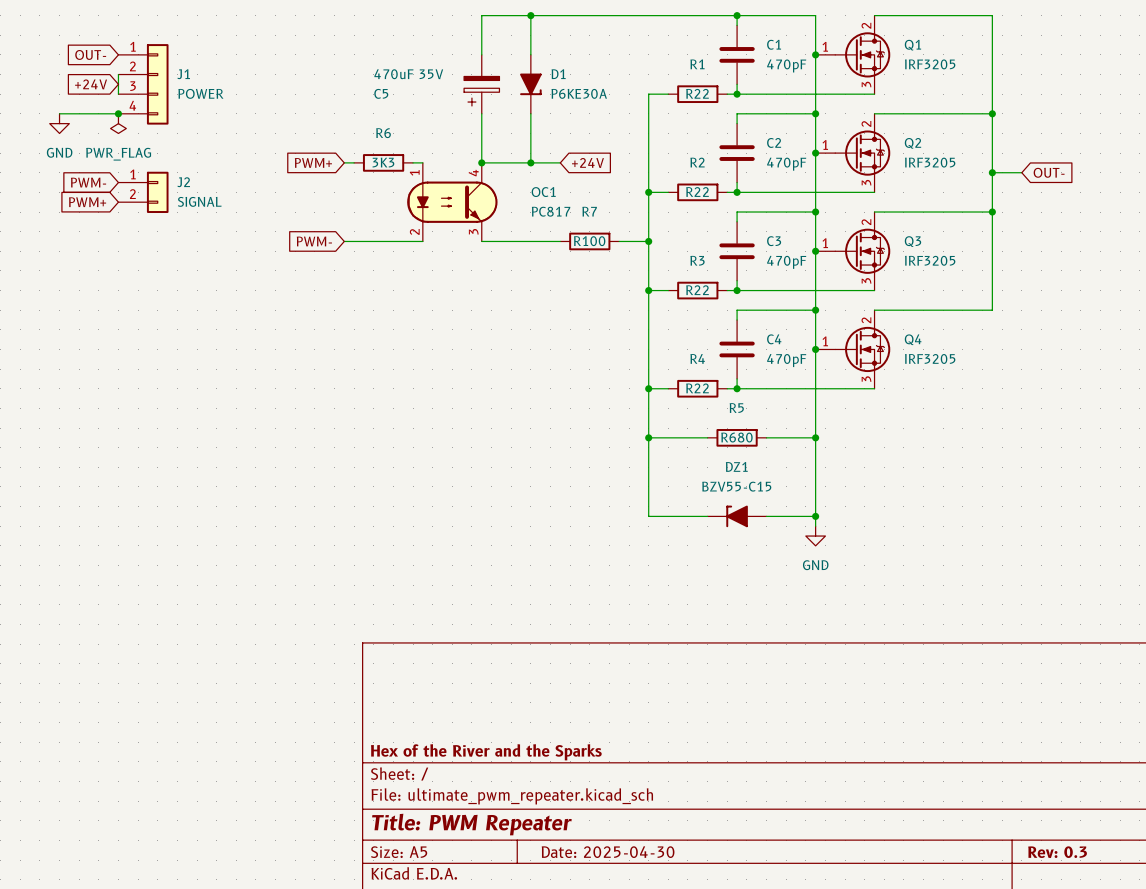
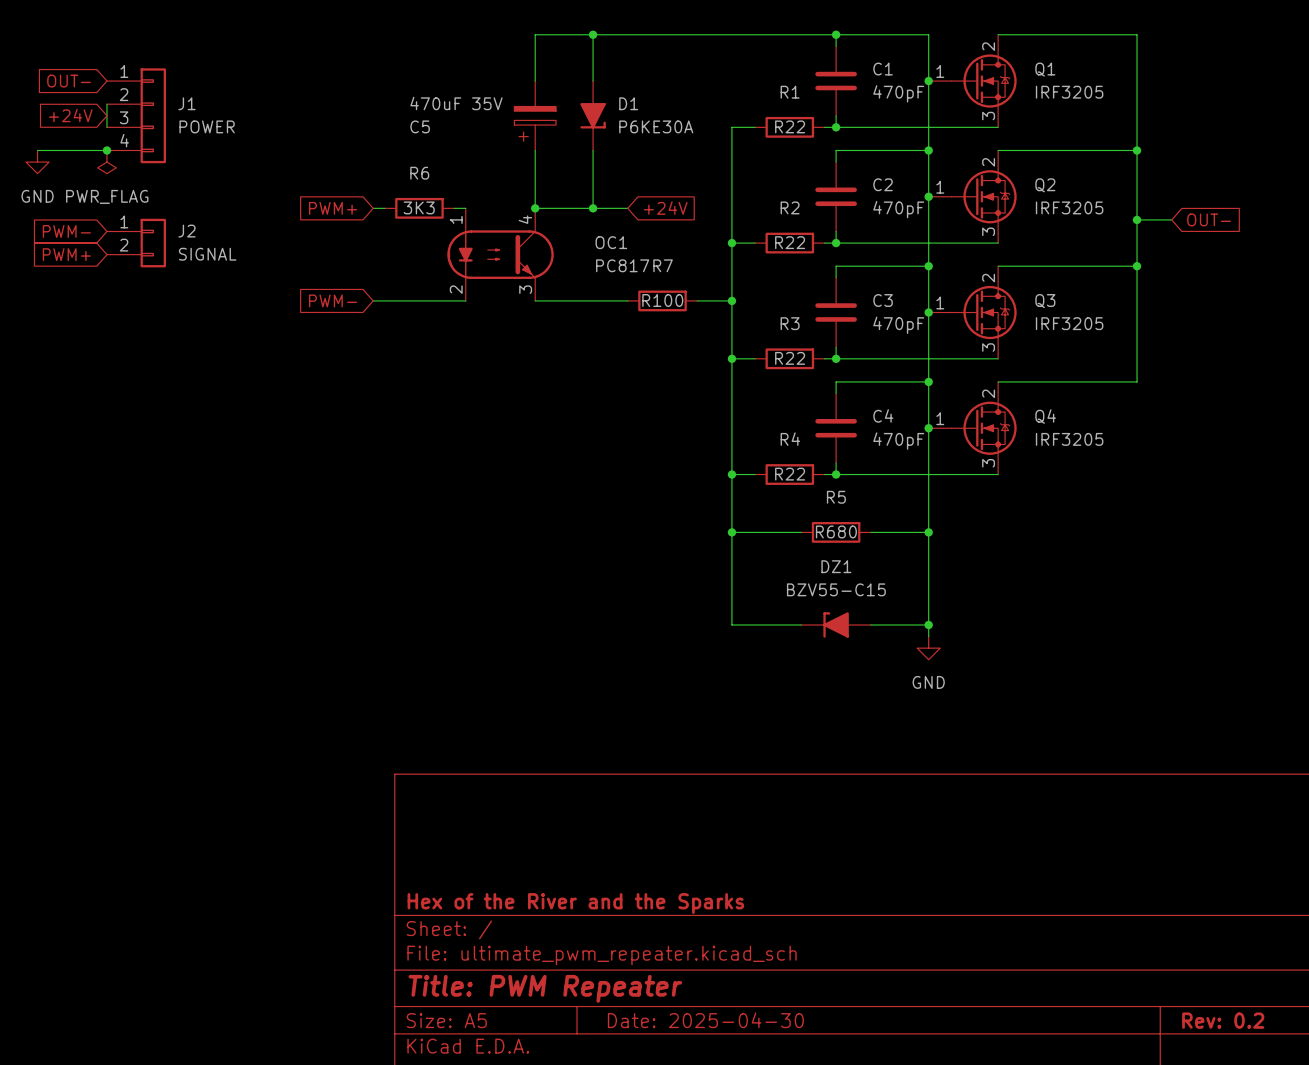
title block: Rev: 0.3 (1057, 852) -> Rev: 0.2 (1223, 1020)

